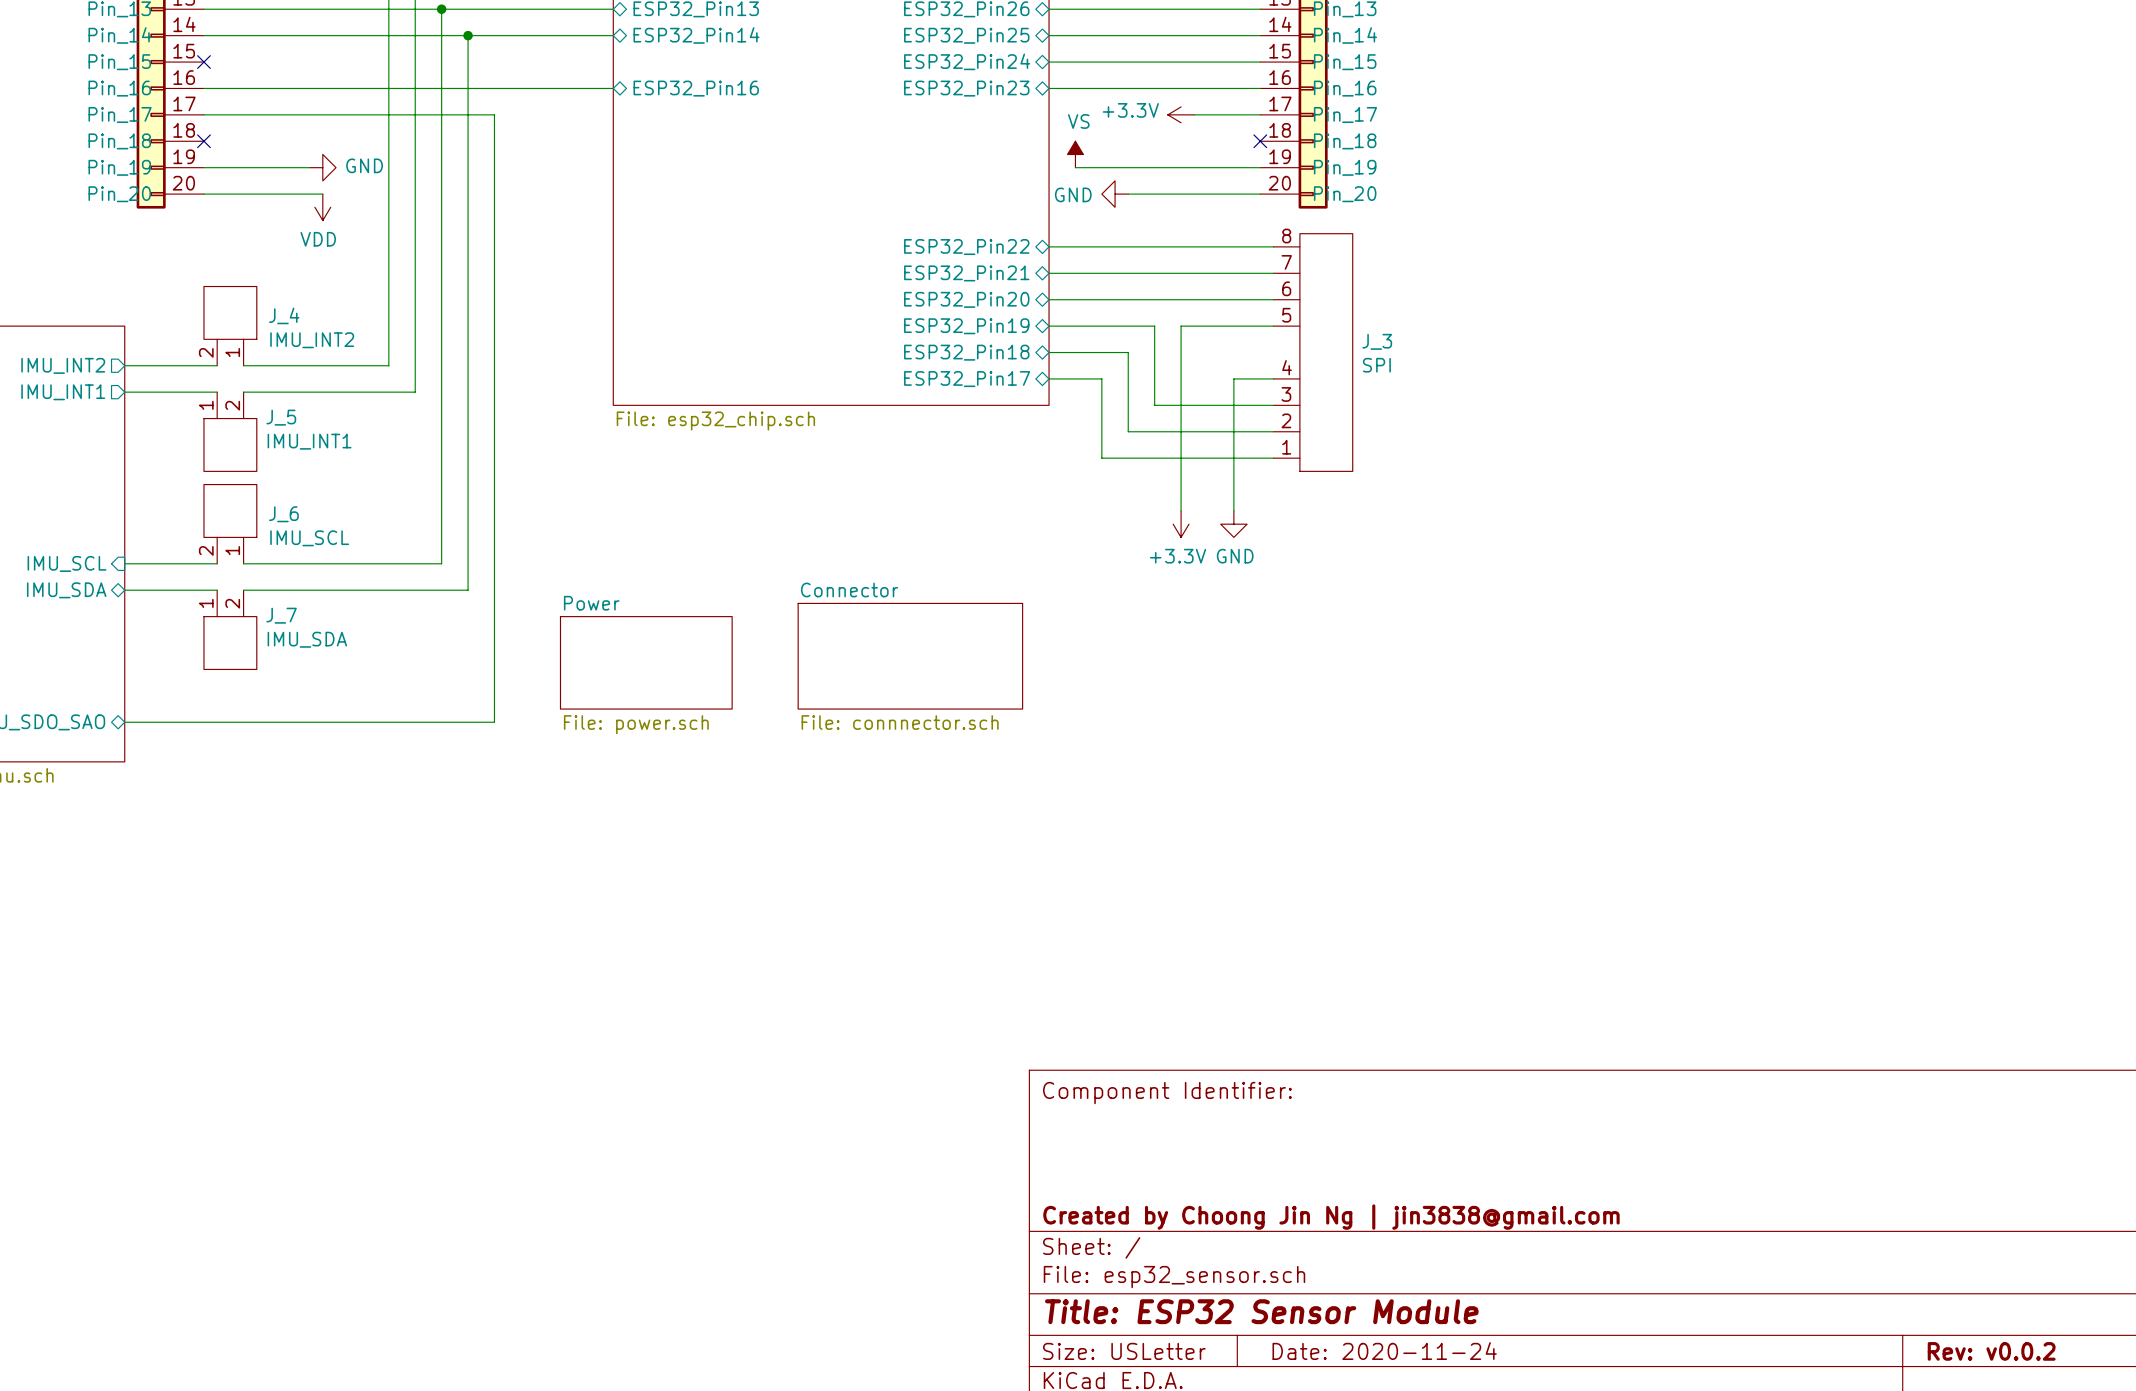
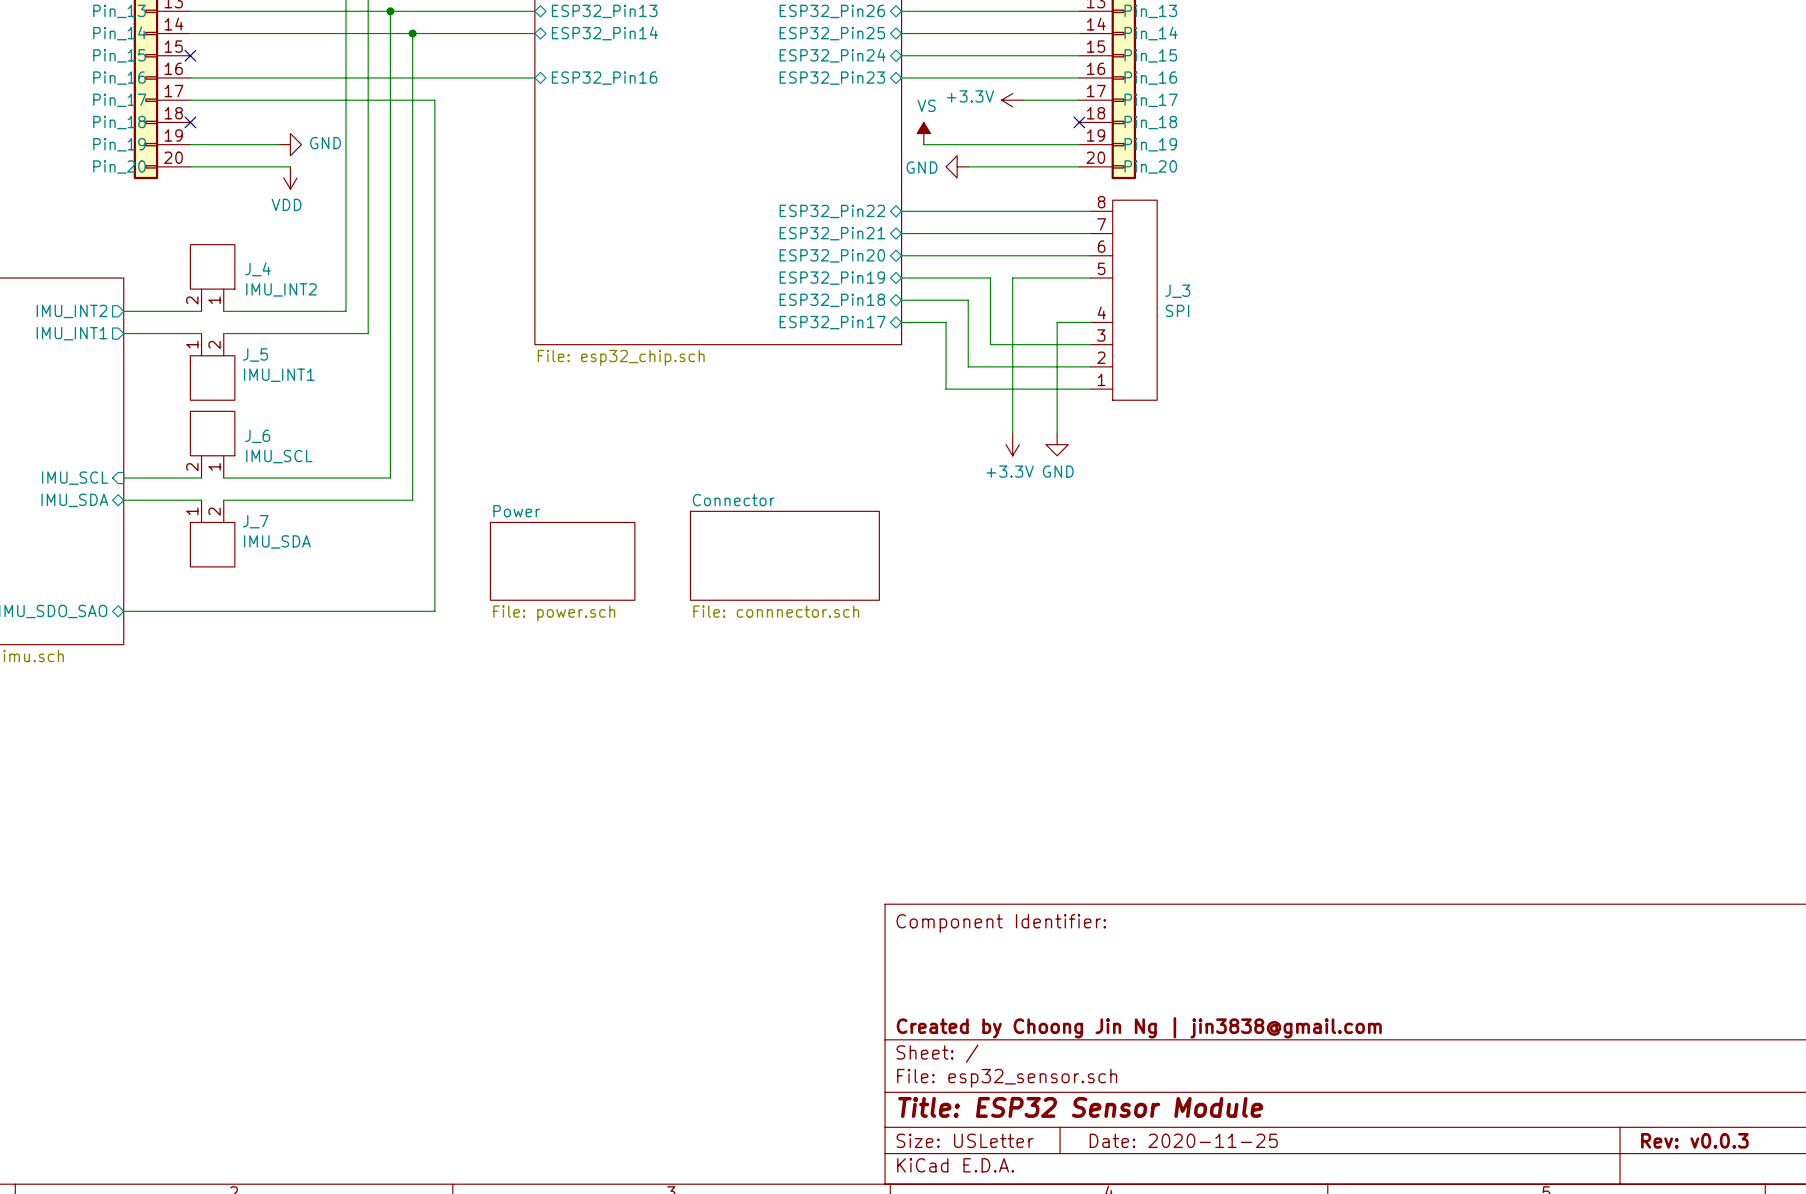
title block: Date: 2020-11-24 (1384, 1351) -> Date: 2020-11-25 (1183, 1140)
title block: Rev: v0.0.2 (1991, 1351) -> Rev: v0.0.3 (1694, 1140)

